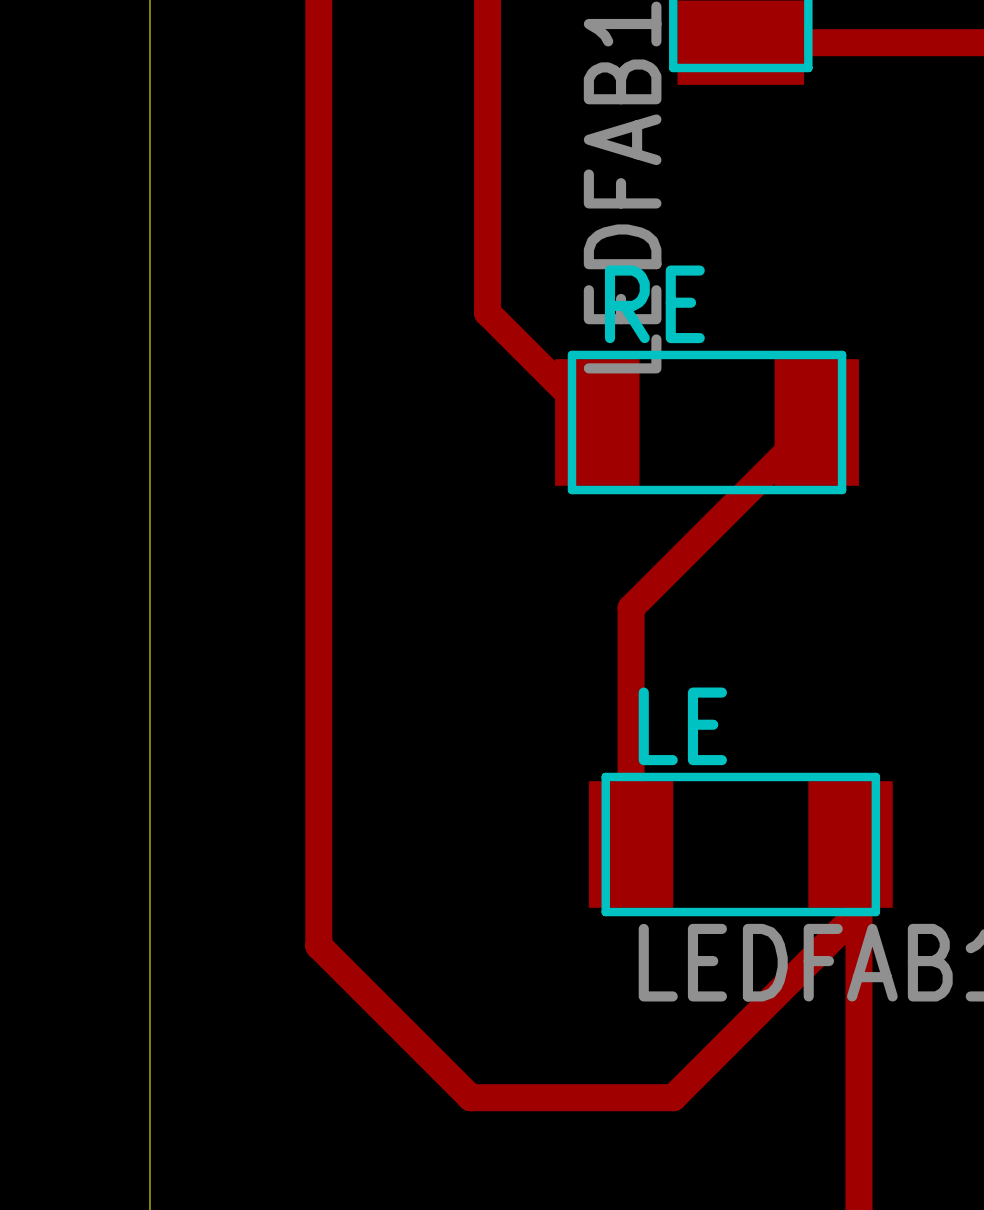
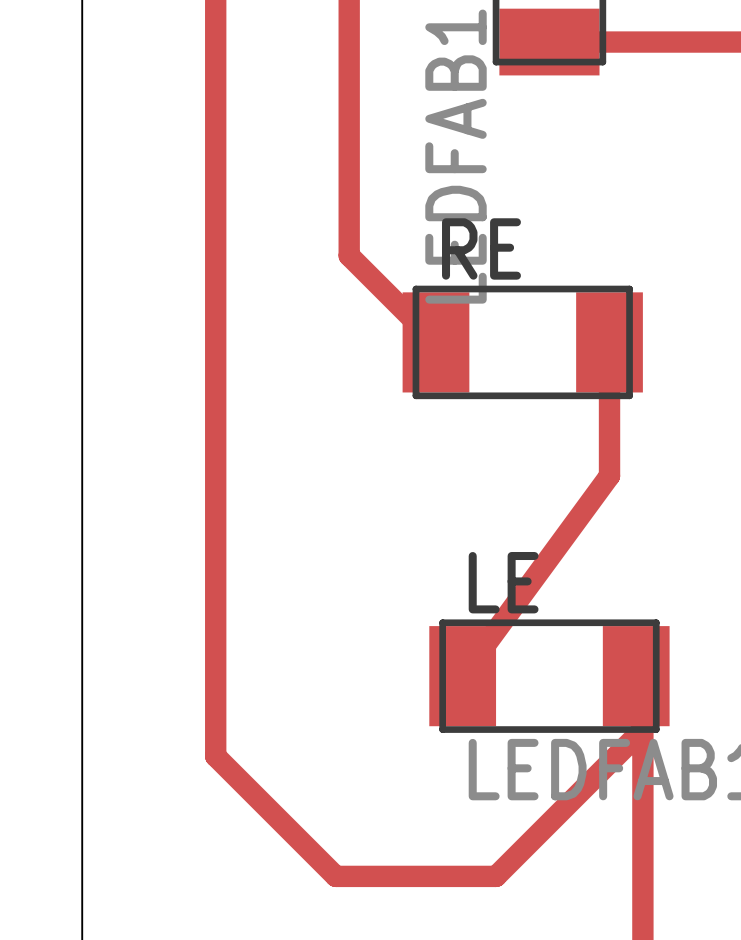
track: (816, 422) (631, 608) (631, 844) -> (609, 342) (609, 475) (462, 676)

